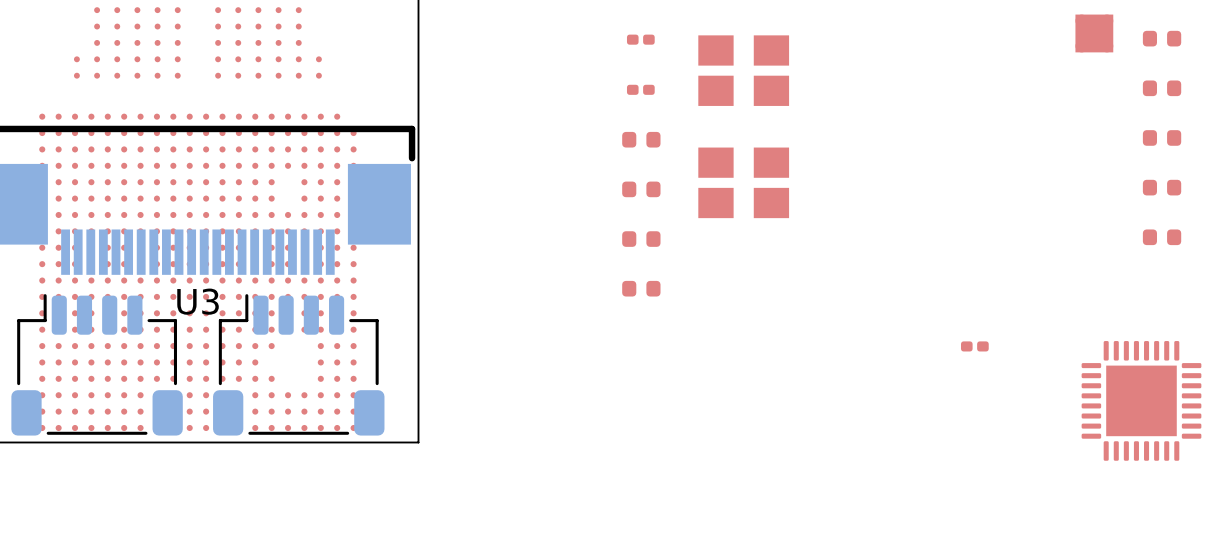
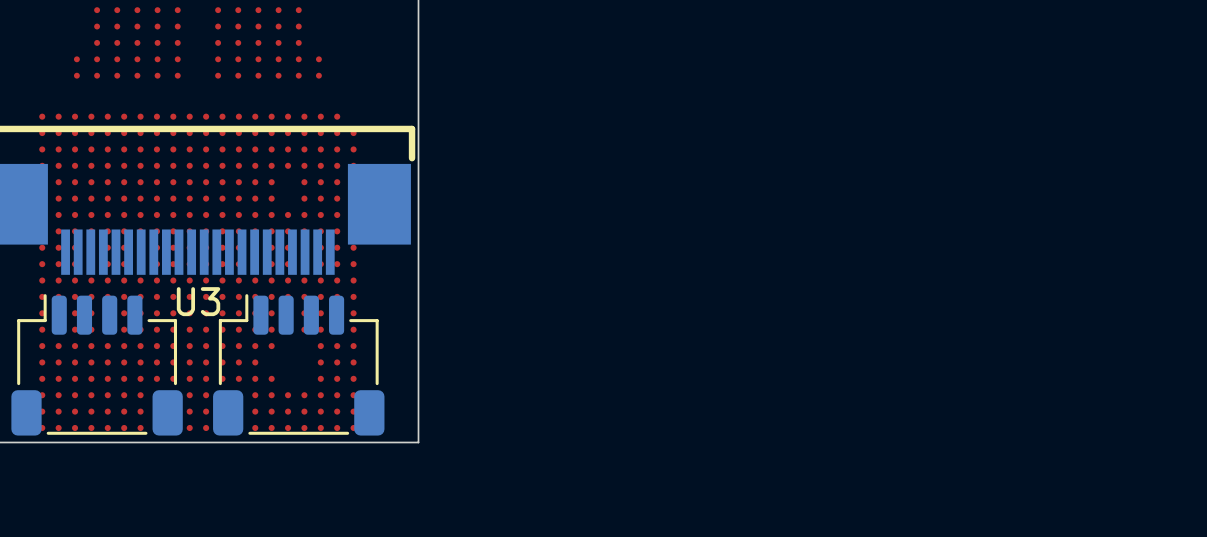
part: (1094, 33) -> none
part: (1162, 38) -> none
part: (640, 39) -> none
part: (743, 70) -> none
part: (1162, 88) -> none
part: (640, 89) -> none
part: (1162, 137) -> none
part: (641, 139) -> none
part: (743, 182) -> none
part: (1162, 187) -> none
part: (641, 189) -> none
part: (1162, 237) -> none
part: (641, 239) -> none
part: (641, 288) -> none
part: (974, 346) -> none
part: (1141, 400) -> none

